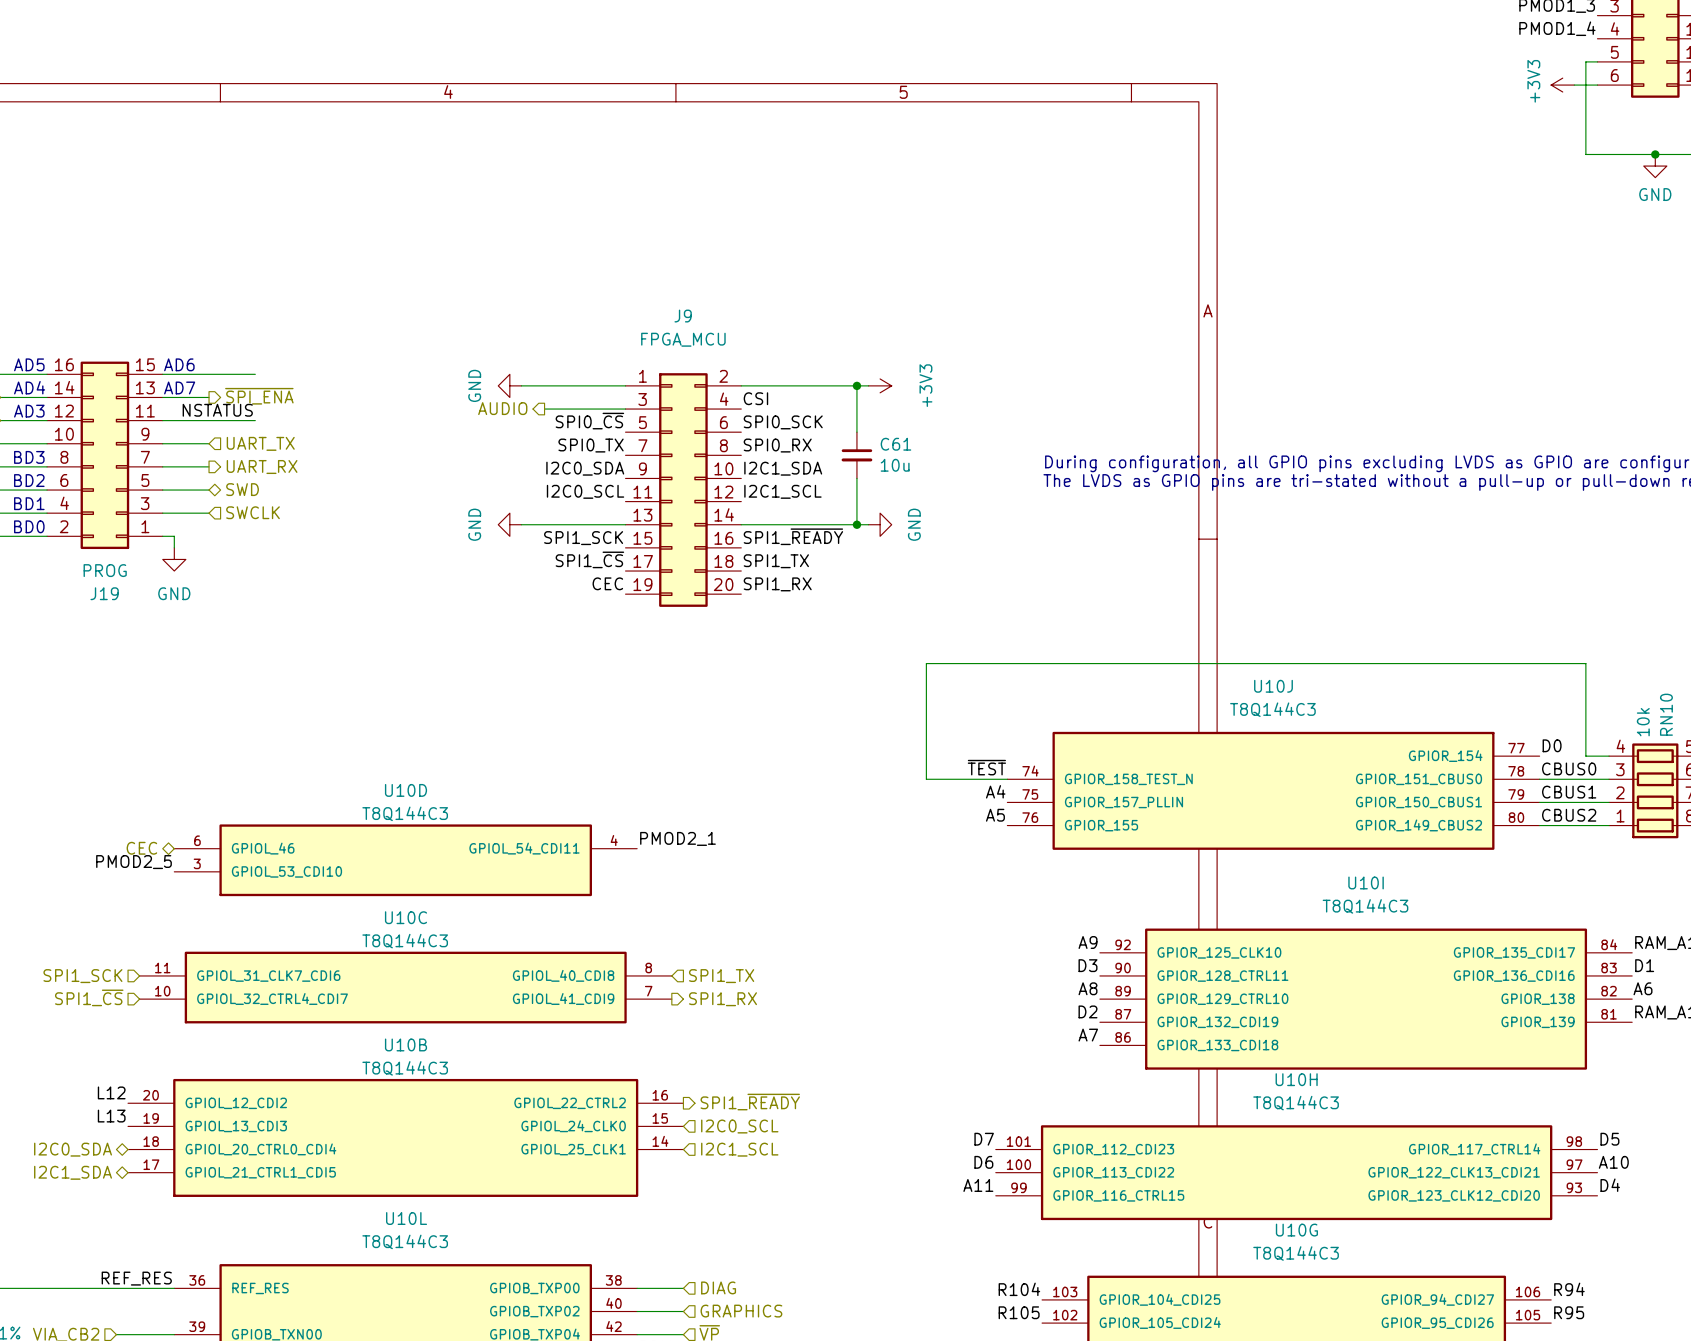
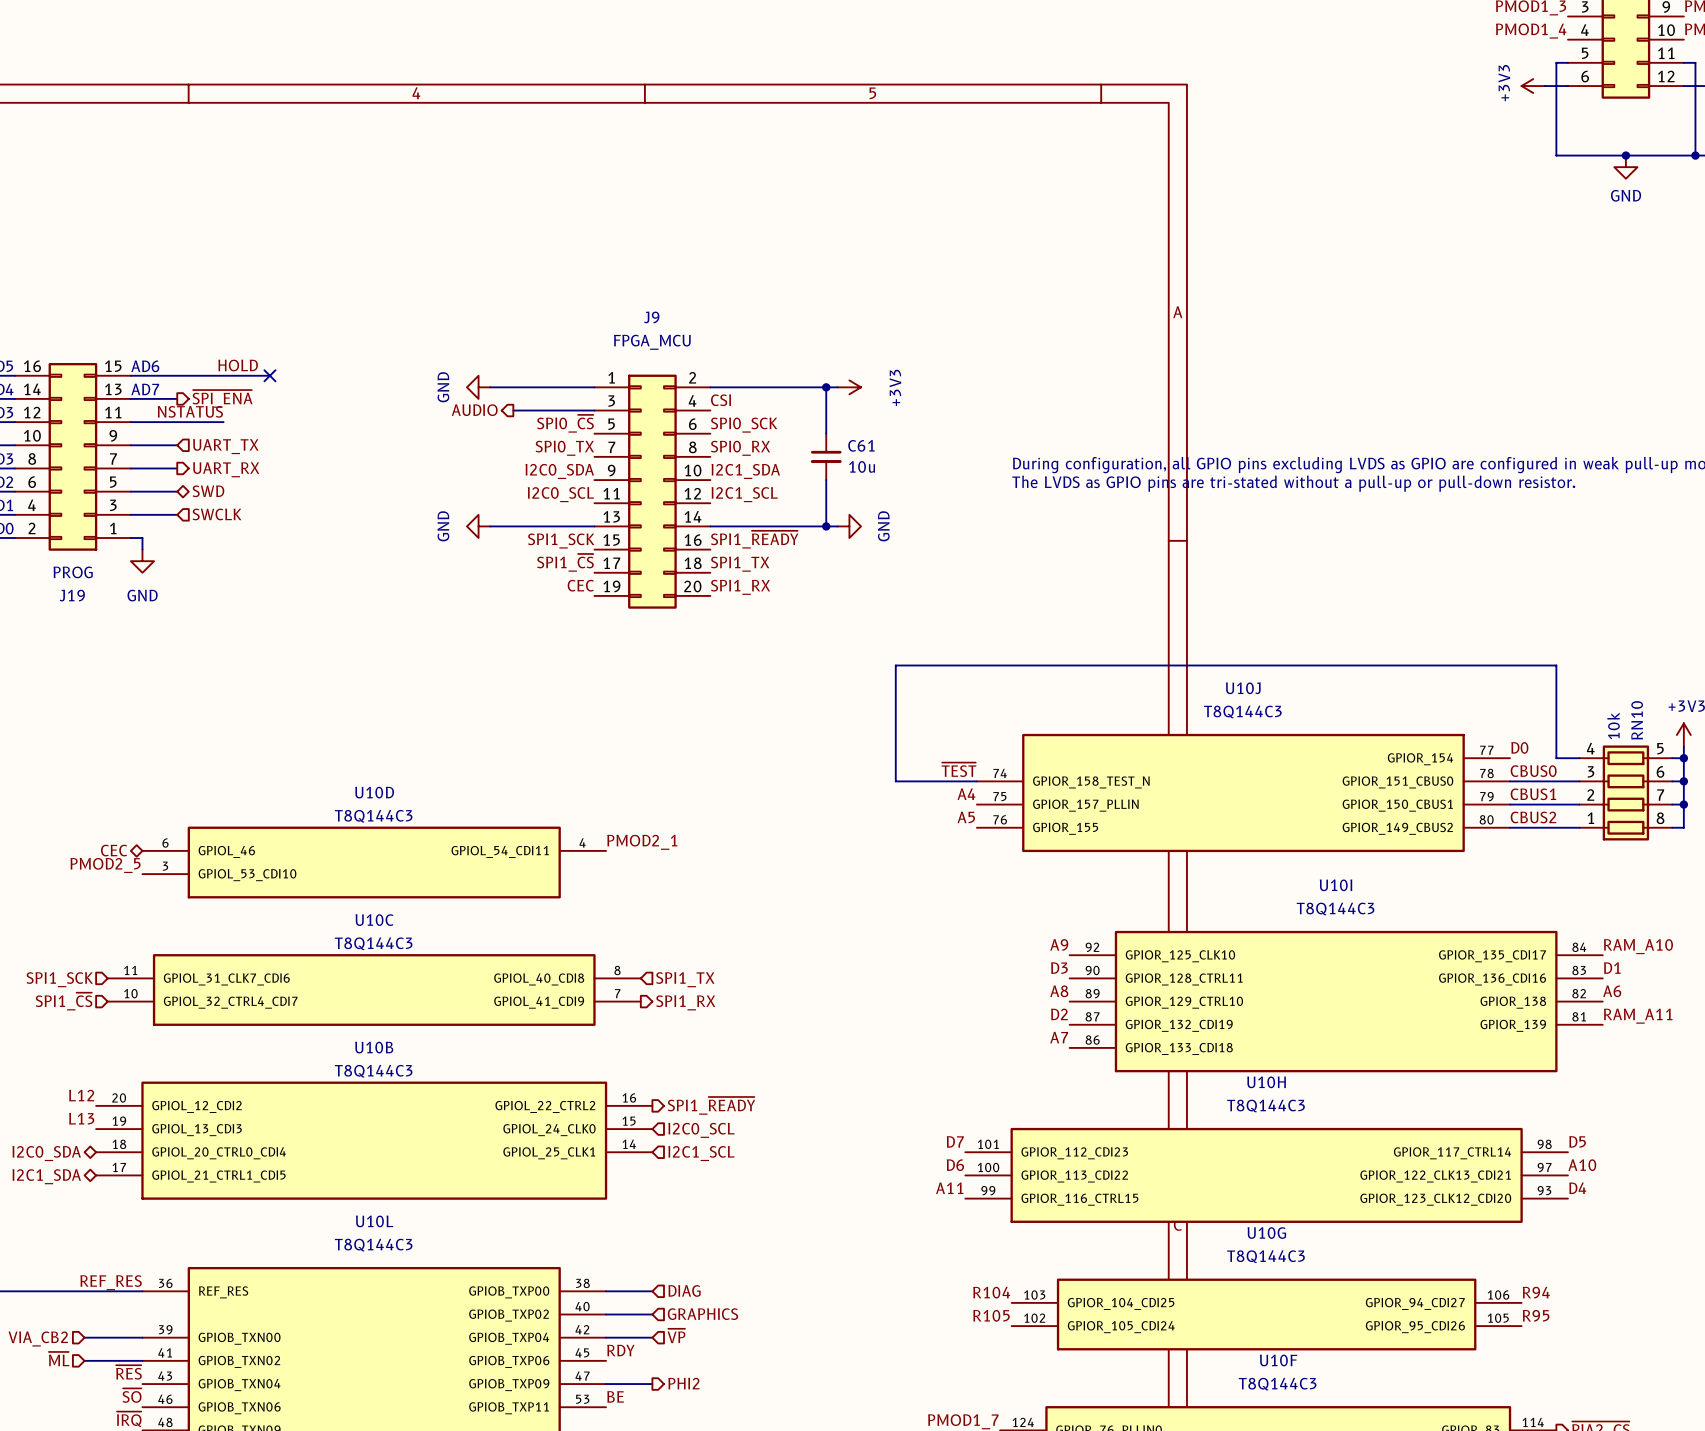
label: none -> HOLD (238, 365)
wire: none -> (223, 375) (269, 375)
no-connect mark: none -> (269, 375)

